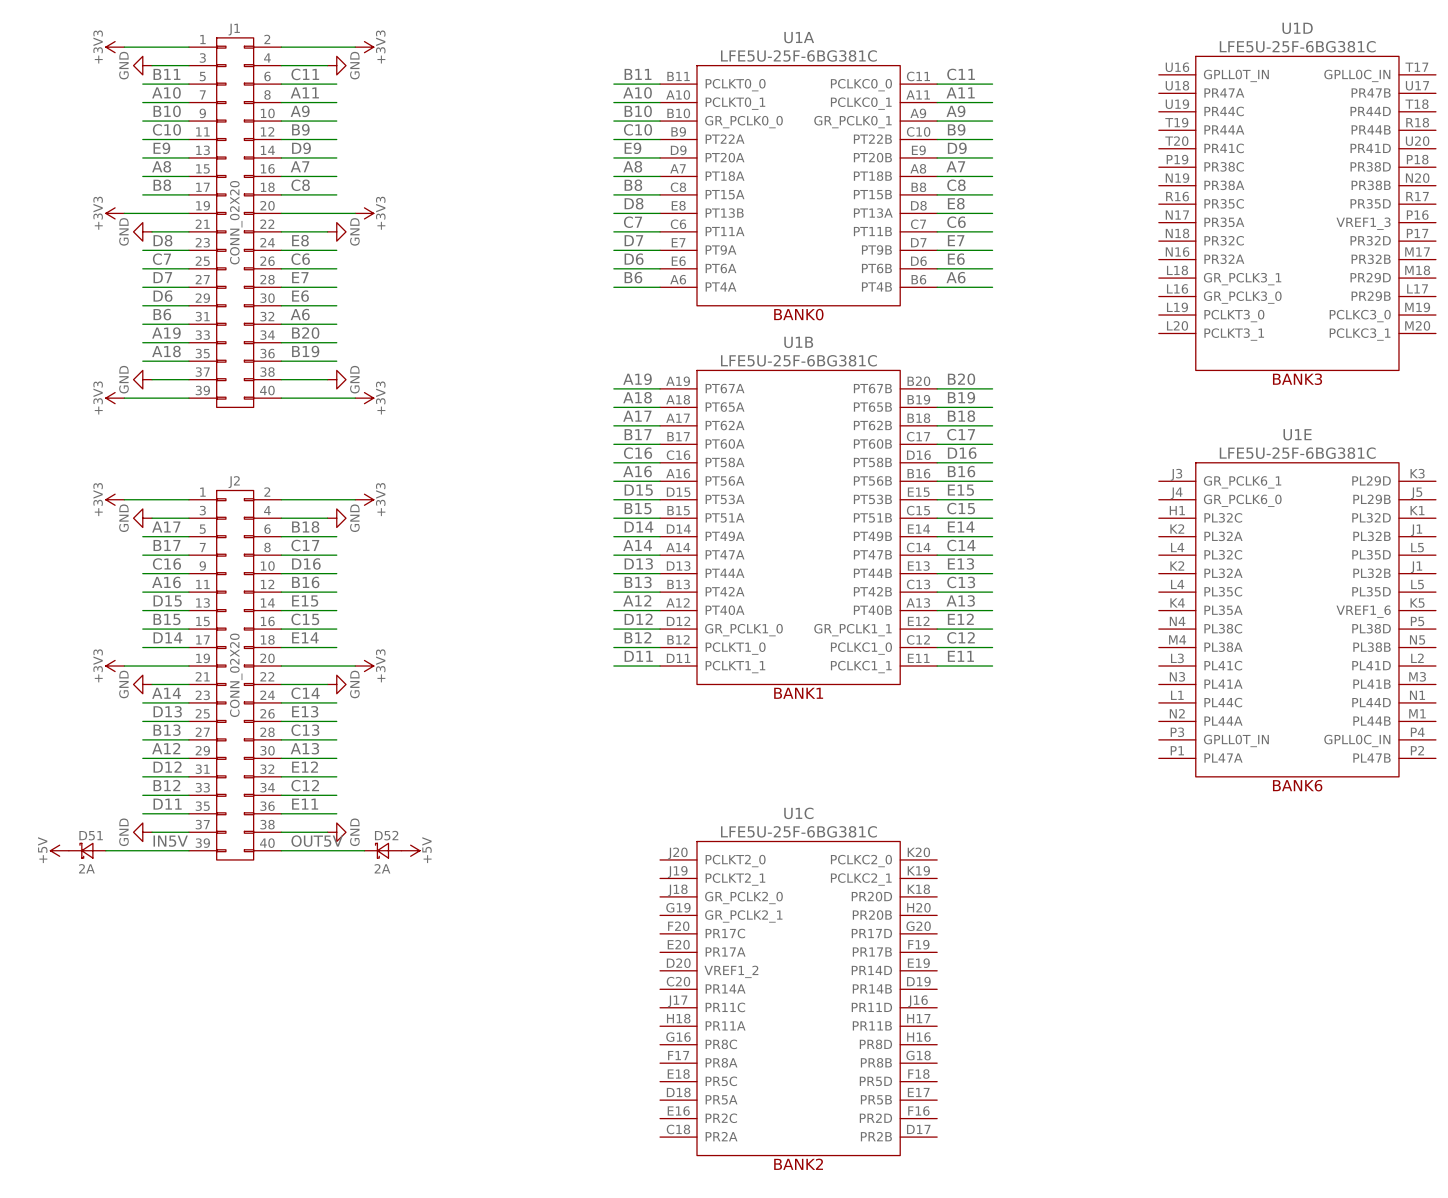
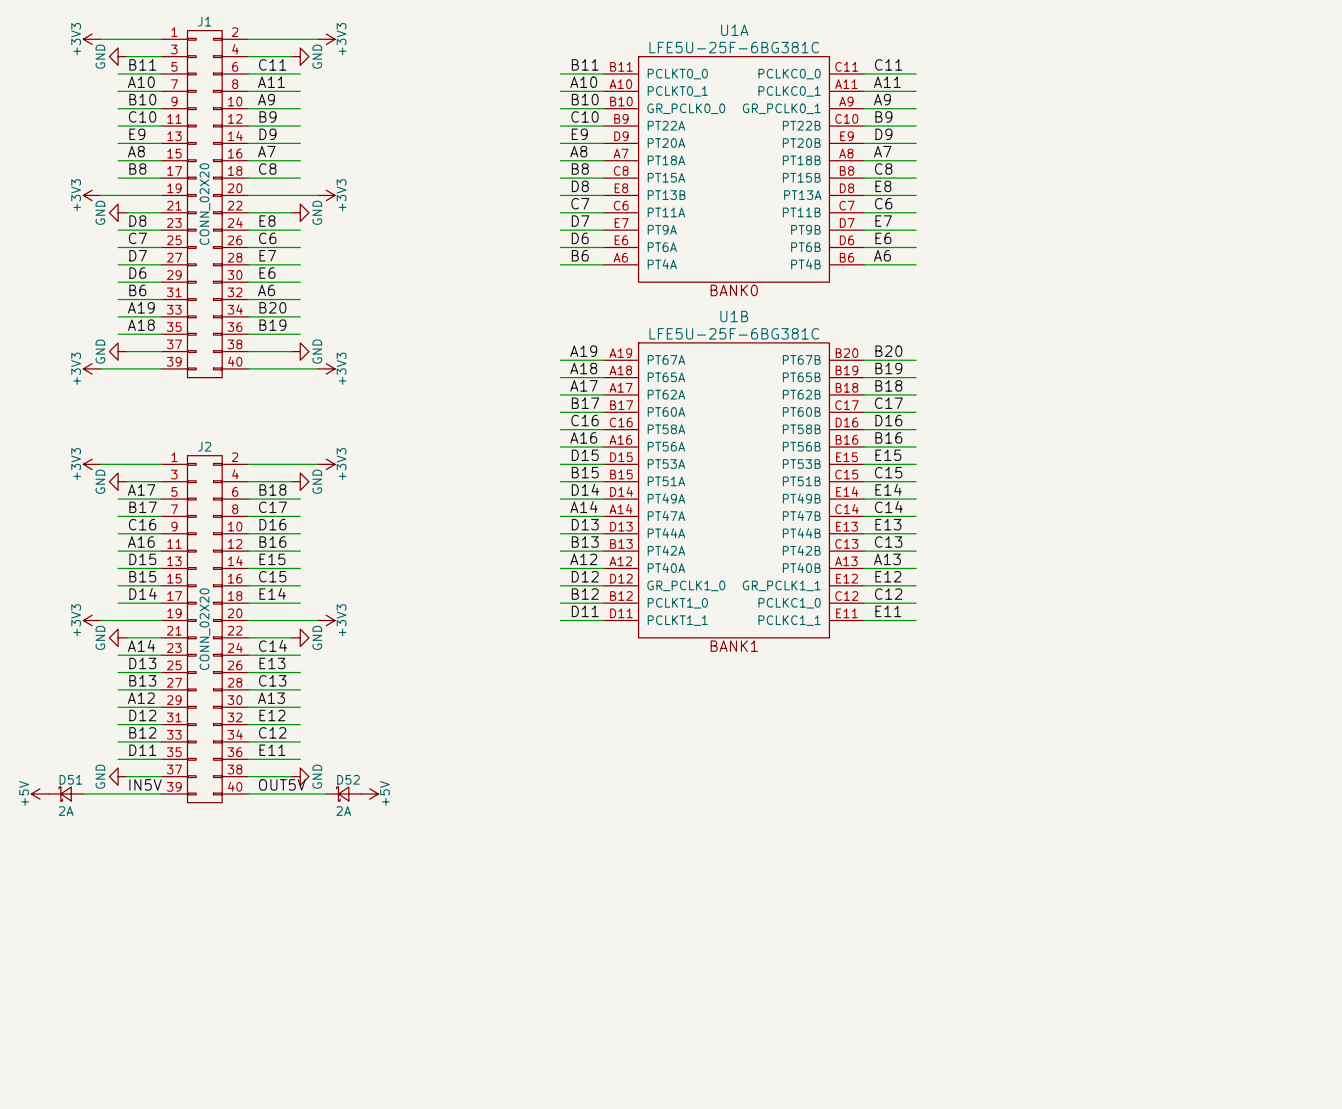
U1D: LFE5U-25F-6BG381C (1297, 213) -> none
U1E: LFE5U-25F-6BG381C (1297, 619) -> none
U1C: LFE5U-25F-6BG381C (798, 998) -> none

